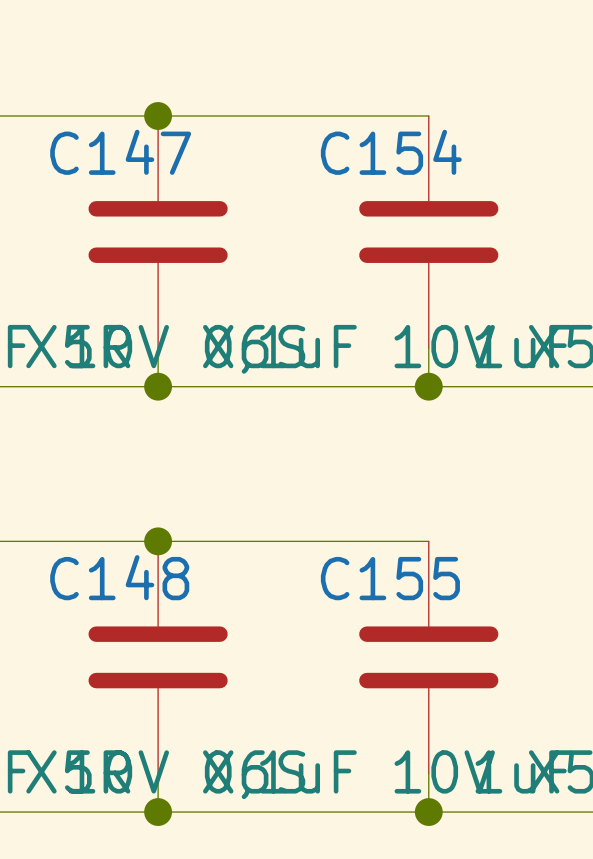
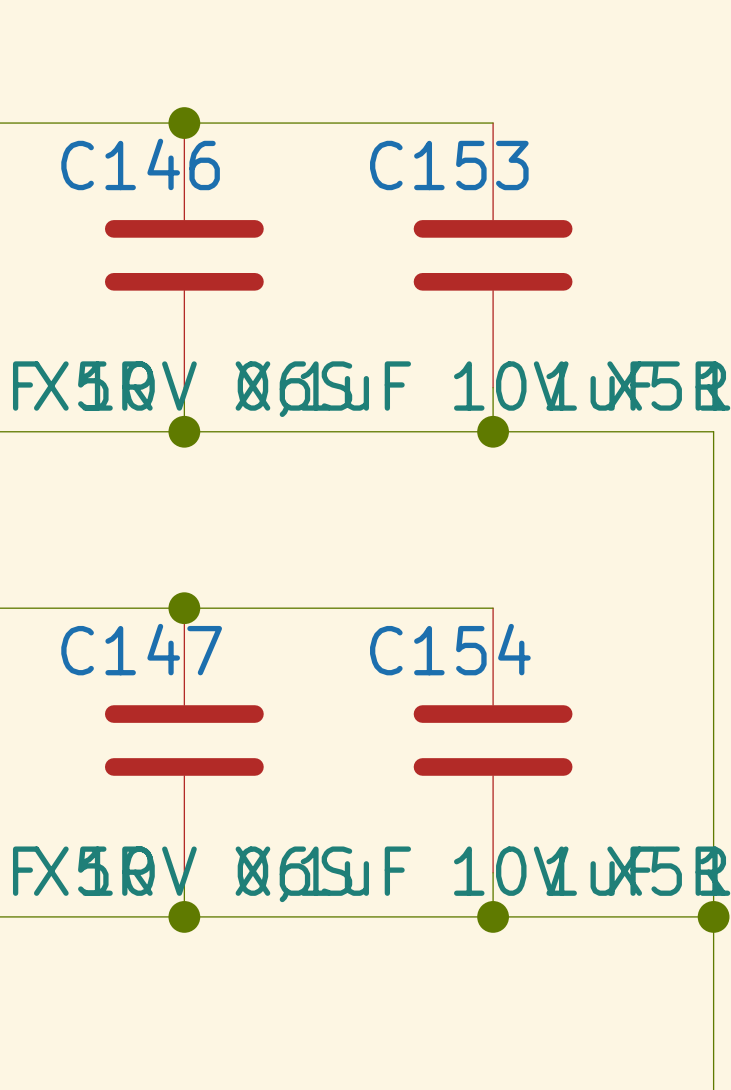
C147 name: C147 (120, 152) -> C146 (140, 164)
C154 name: C154 (391, 152) -> C153 (449, 165)
C148 name: C148 (119, 577) -> C147 (141, 649)
C155 name: C155 (390, 578) -> C154 (450, 649)

